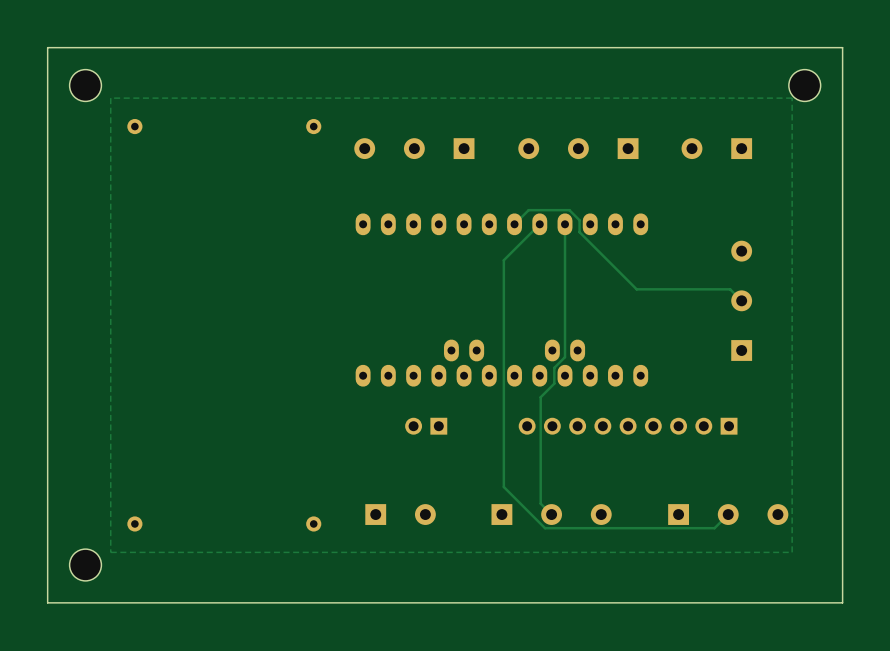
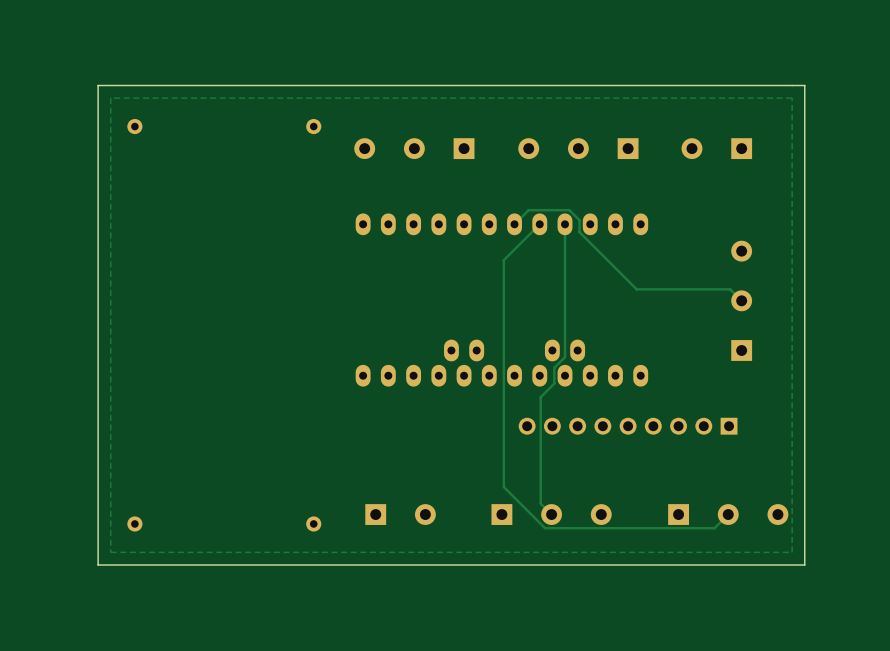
board edge: (842, 47) (842, 602) (47, 602) (47, 47) (842, 47) -> (804, 85) (804, 565) (98, 565) (98, 85) (804, 85)
part: (85, 85) -> none
part: (804, 85) -> none
part: (426, 426) -> none
part: (85, 565) -> none

